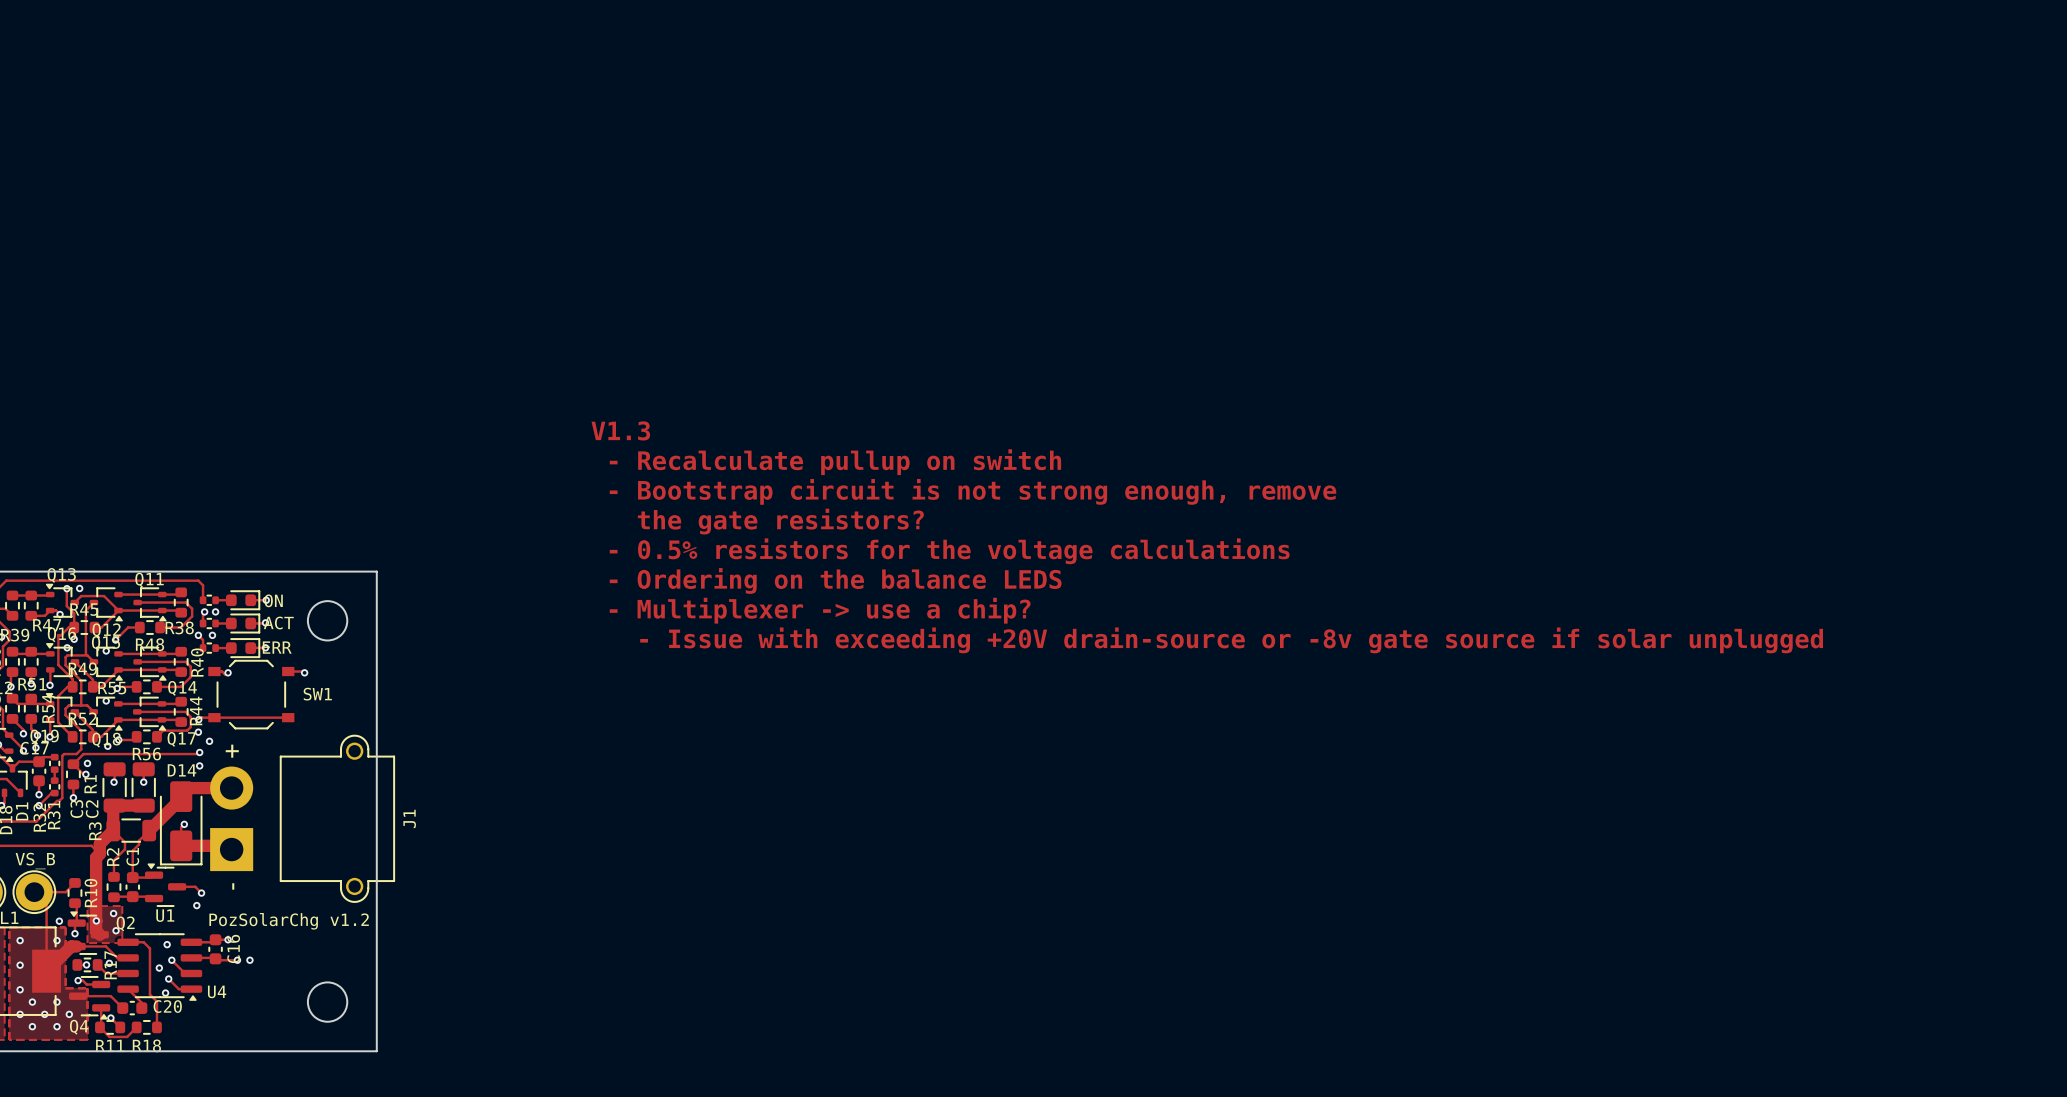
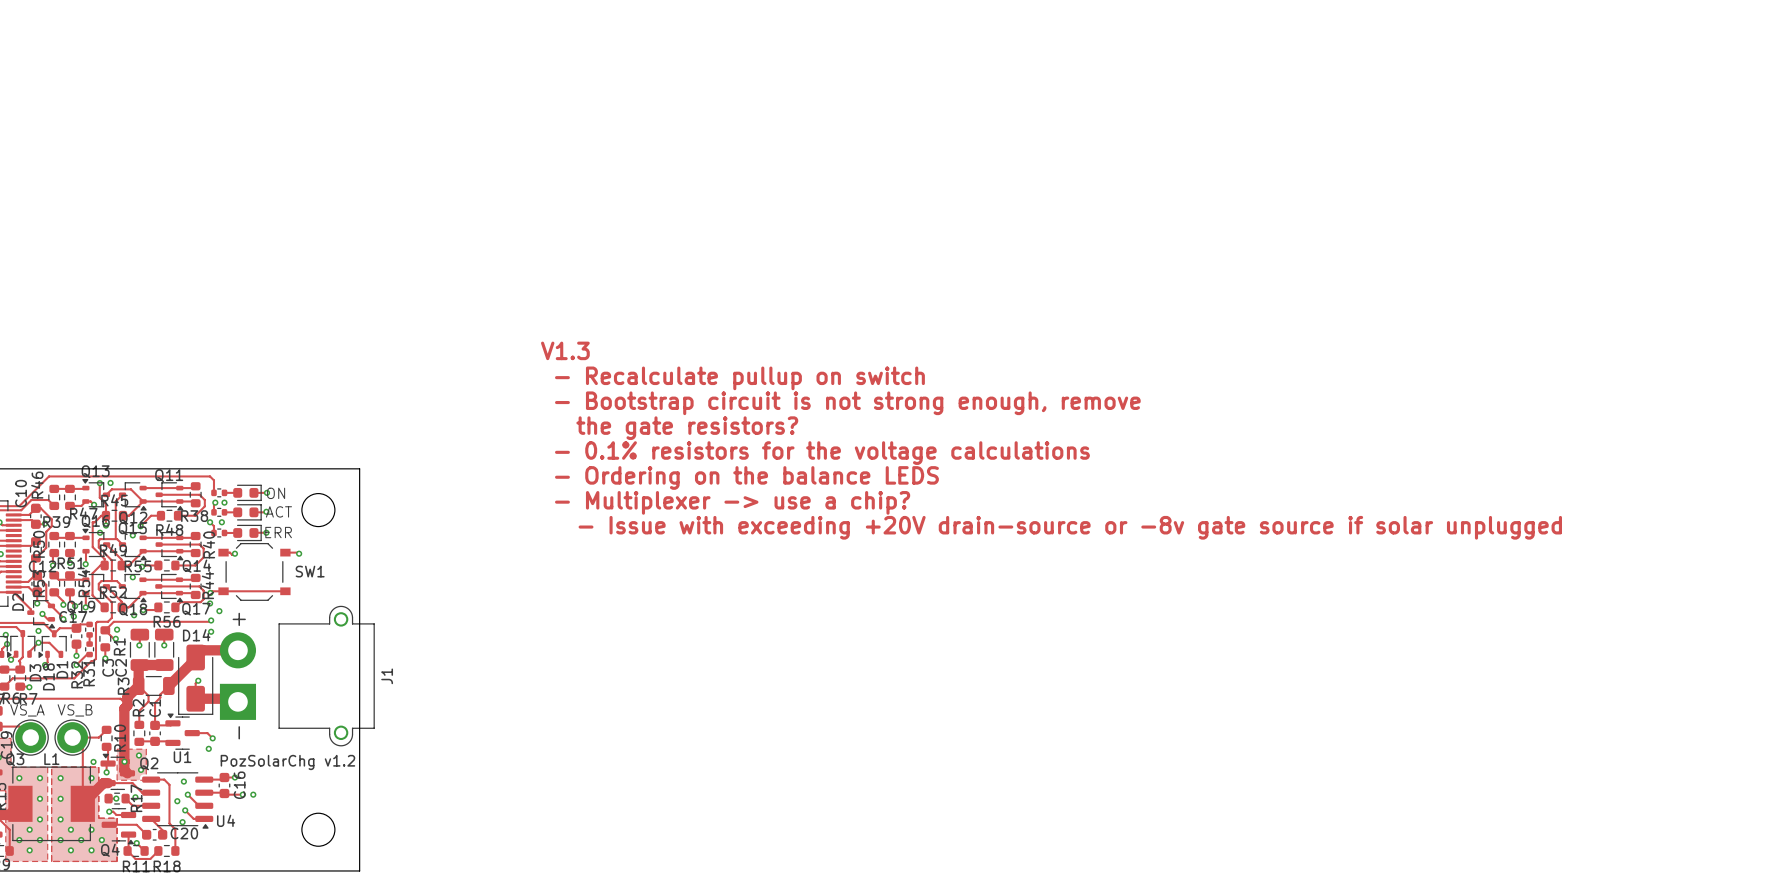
text: - 0.5% resistors for the voltage calculations (949, 551) -> - 0.1% resistors for the voltage calculations (822, 453)

